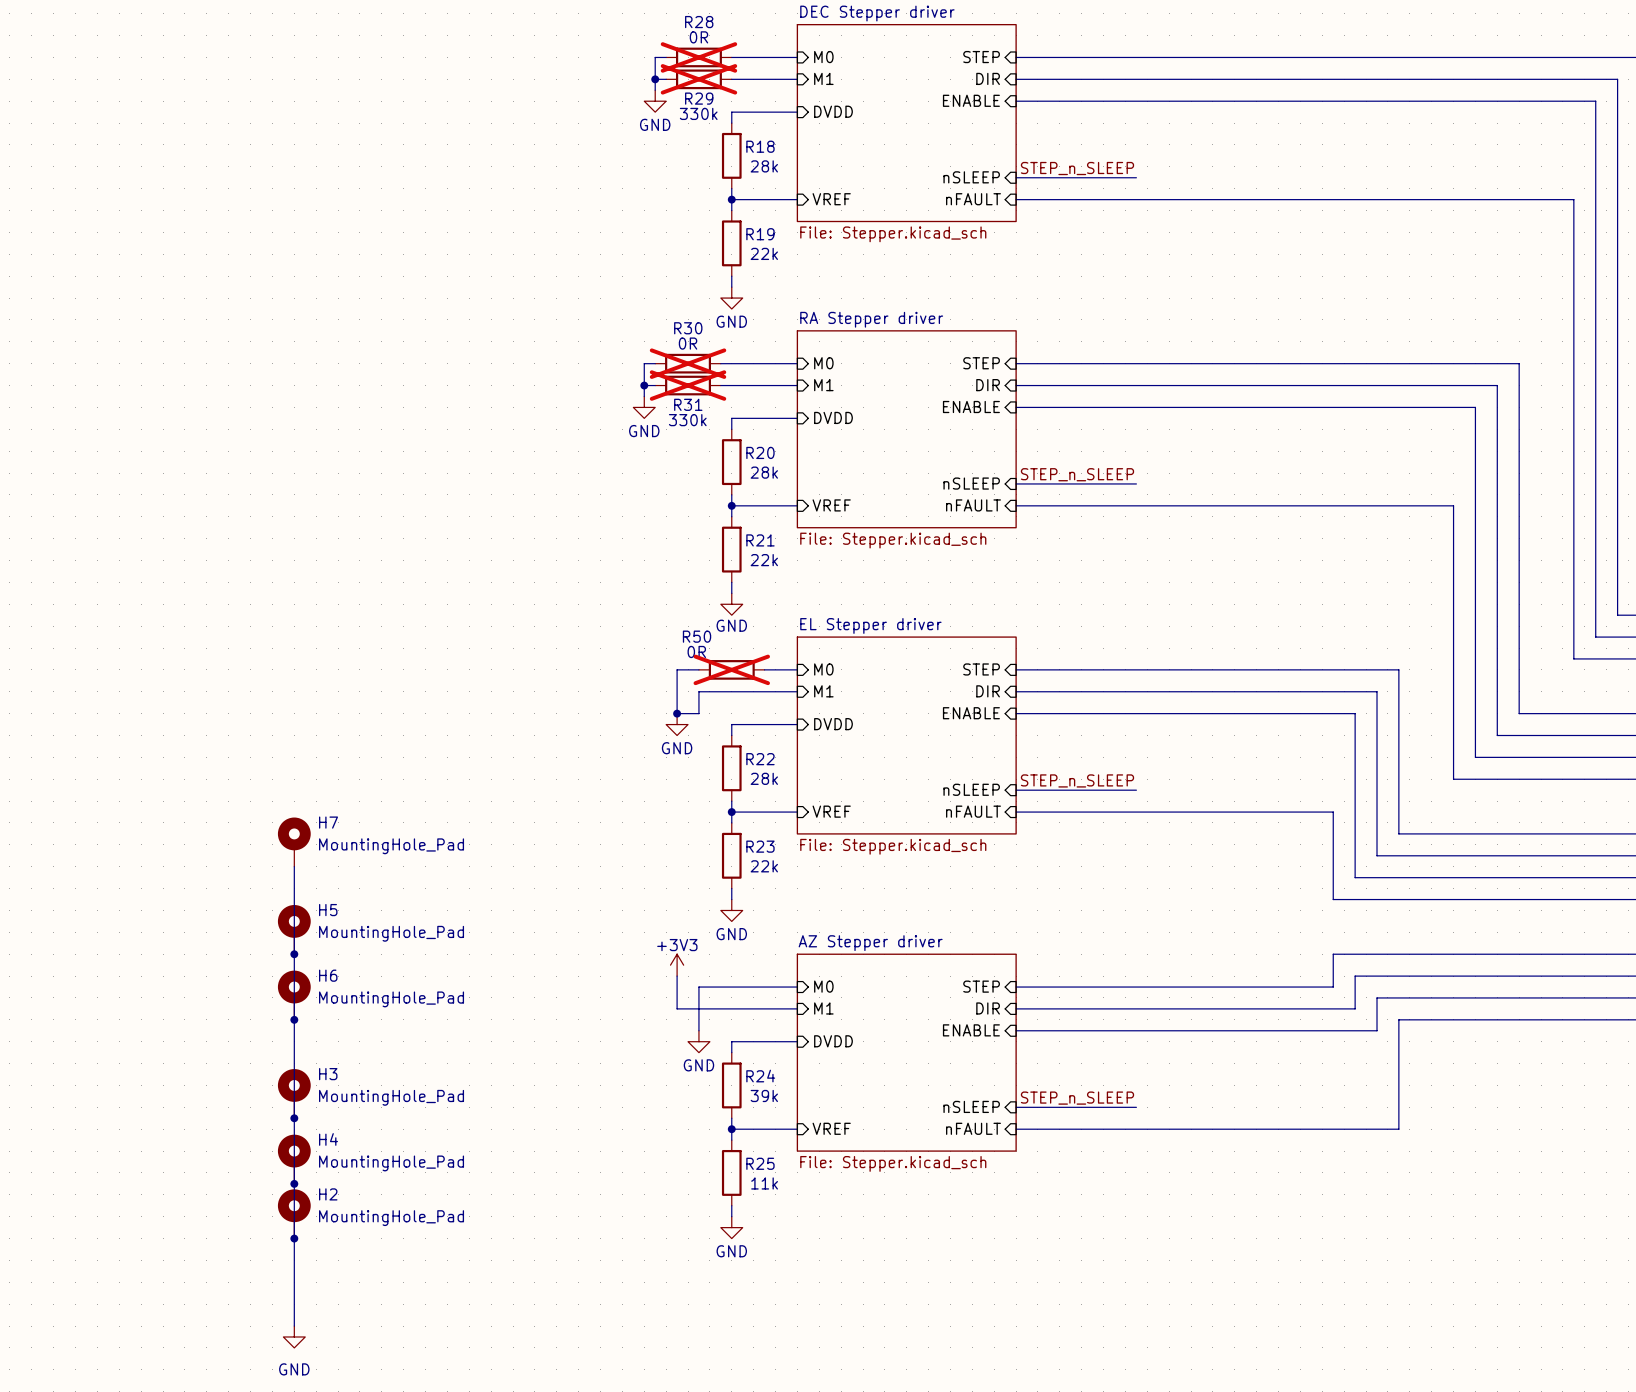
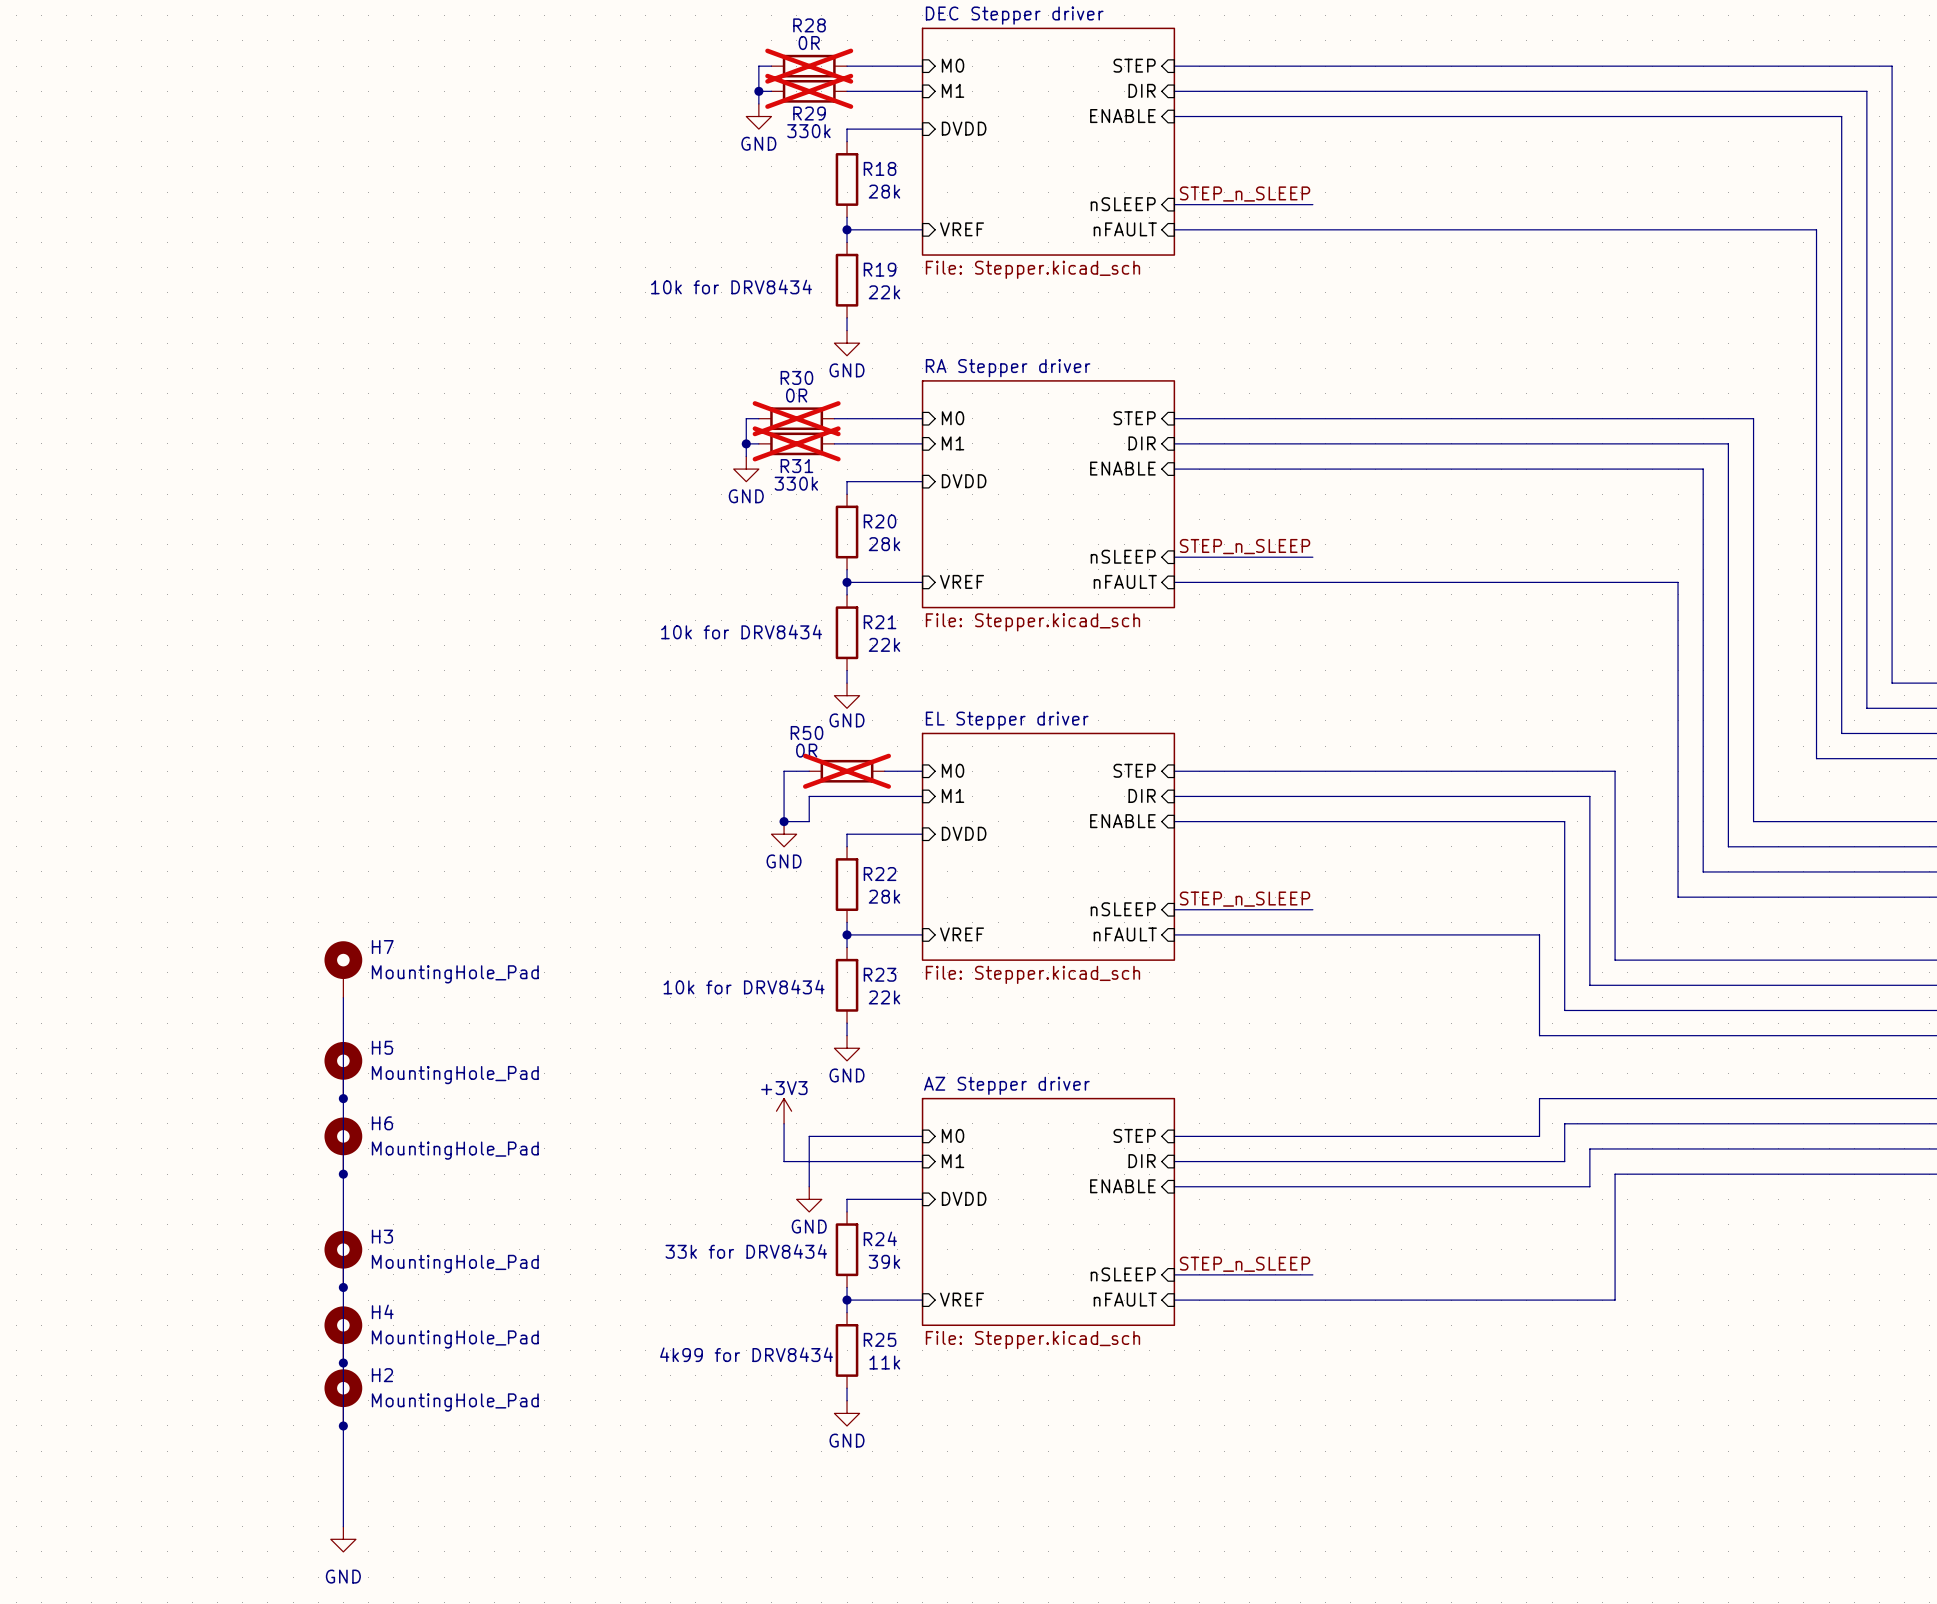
text: none -> 10k for DRV8434 (731, 287)
text: none -> 10k for DRV8434 (741, 632)
text: none -> 10k for DRV8434 (744, 987)
text: none -> 33k for DRV8434 (746, 1251)
text: none -> 4k99 for DRV8434 (746, 1354)

